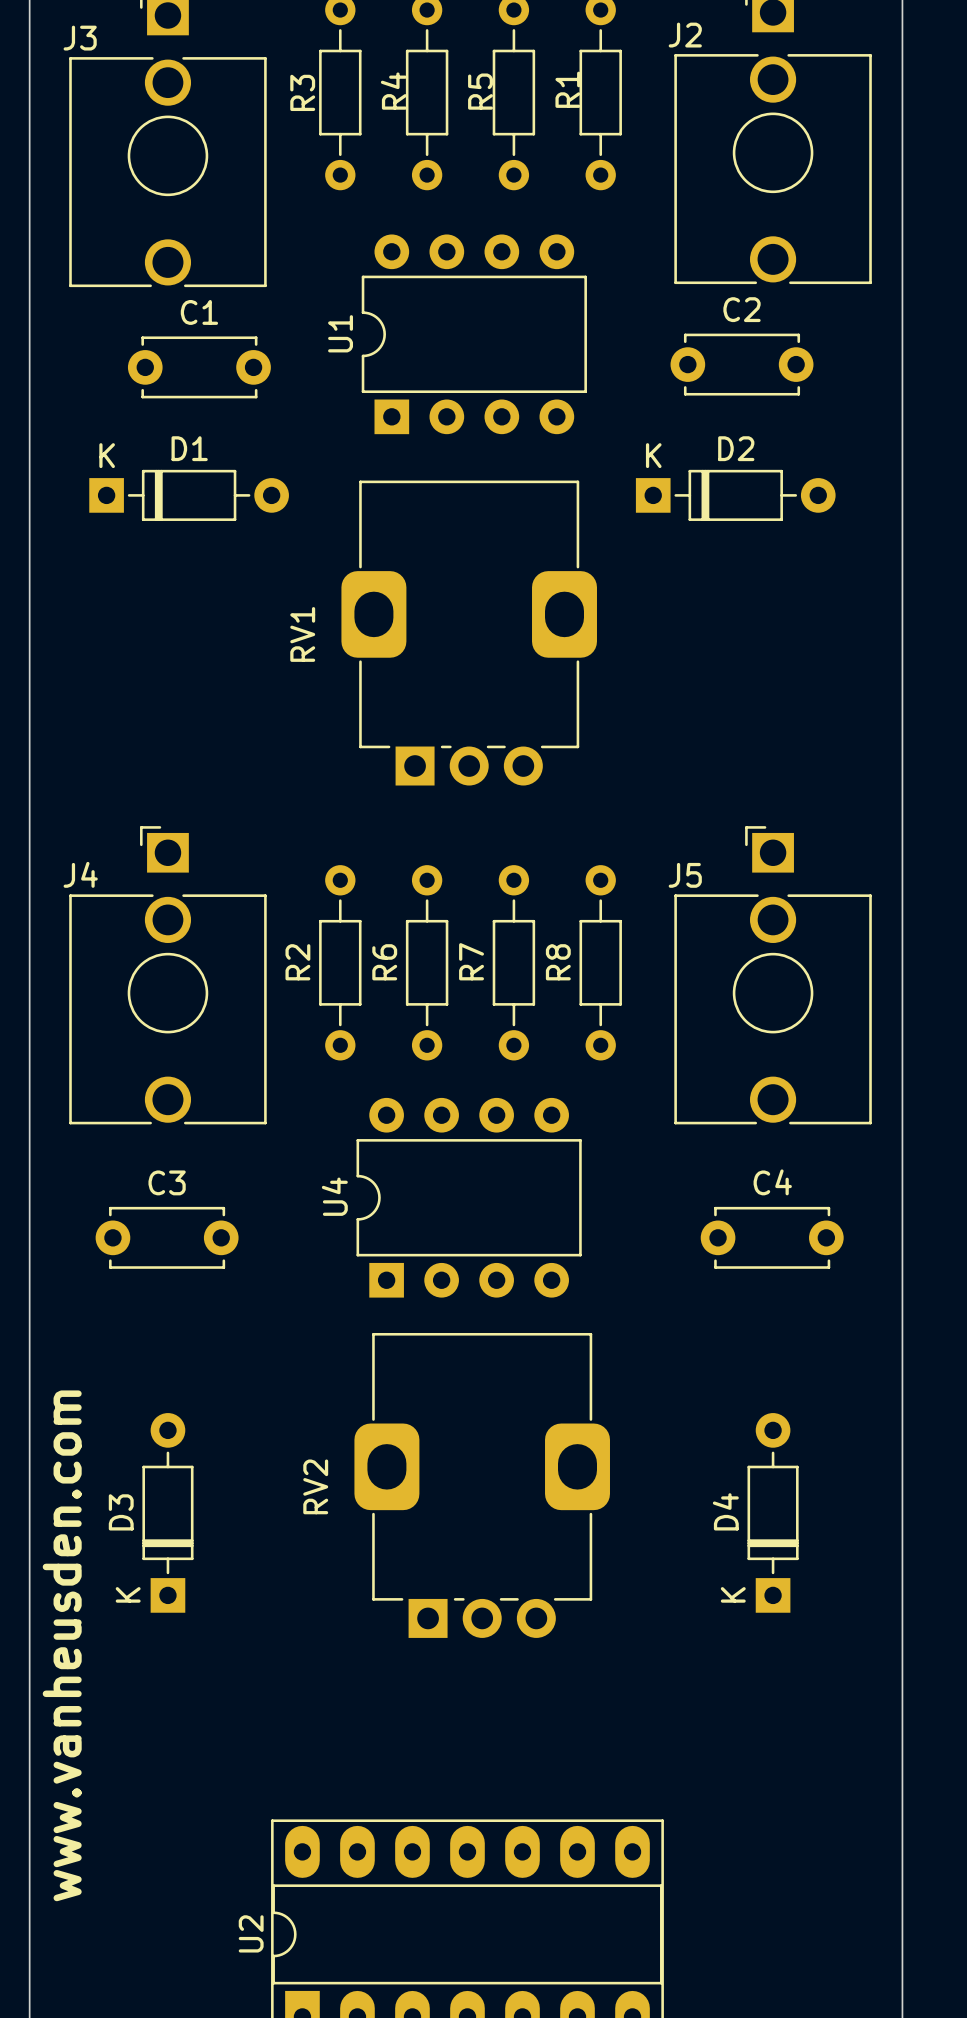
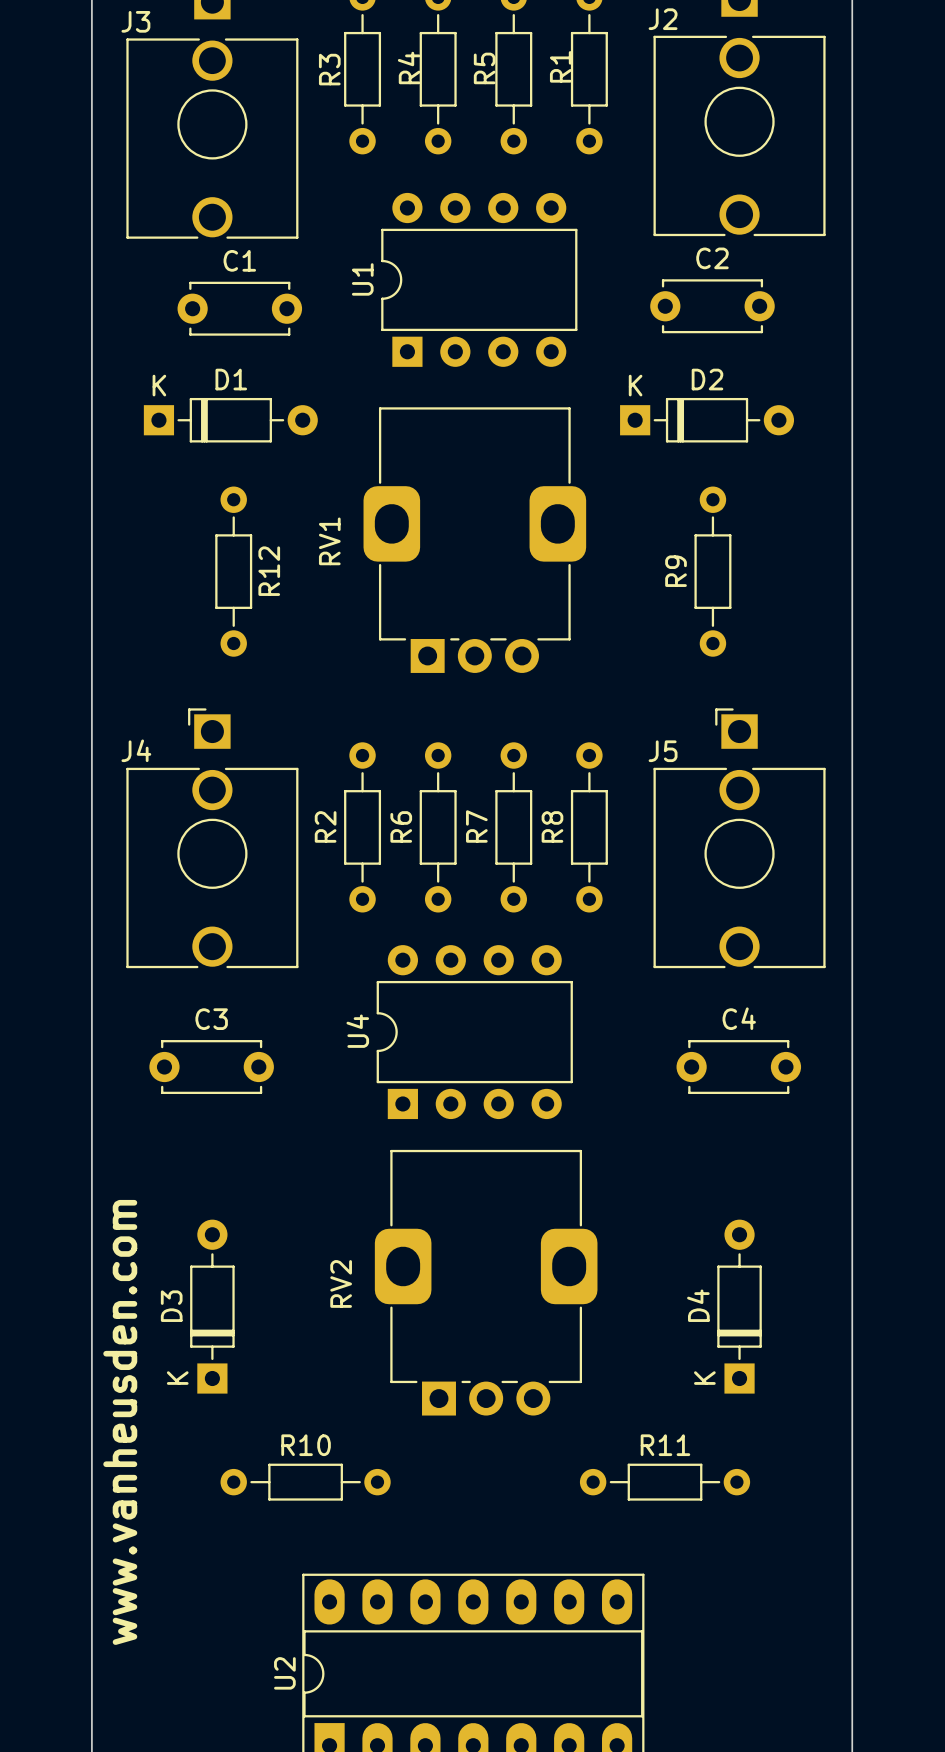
R12: none -> (233, 571)
R9: none -> (712, 571)
R10: none -> (305, 1482)
R11: none -> (665, 1482)

